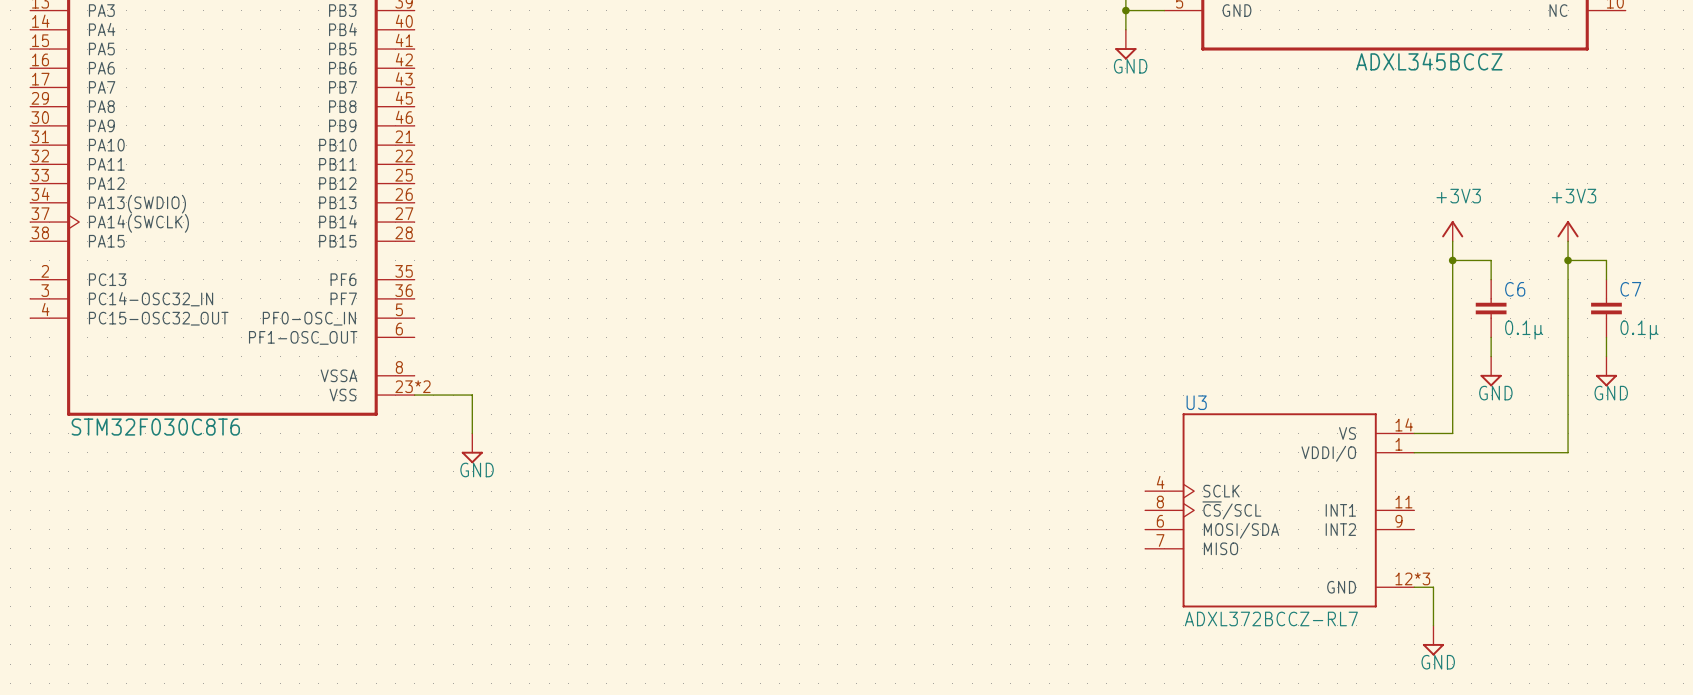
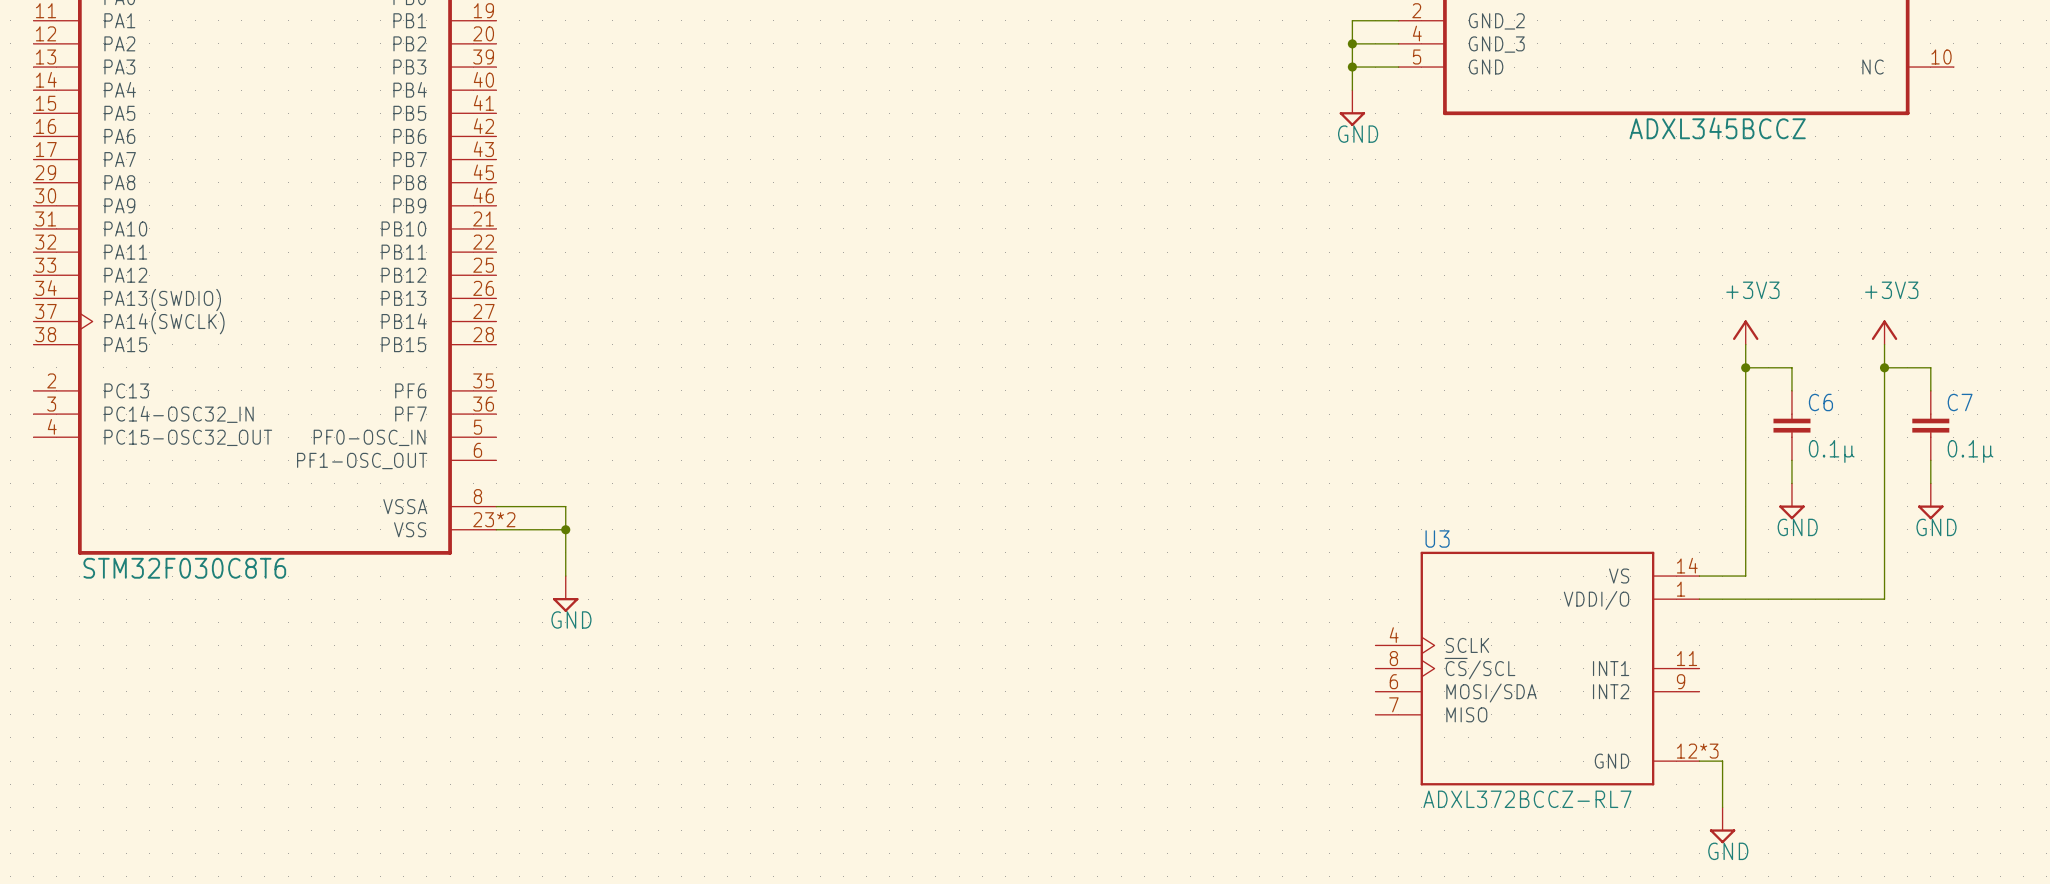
wire: none -> (496, 506) (565, 506) (565, 529)
junction: none -> (565, 529)

